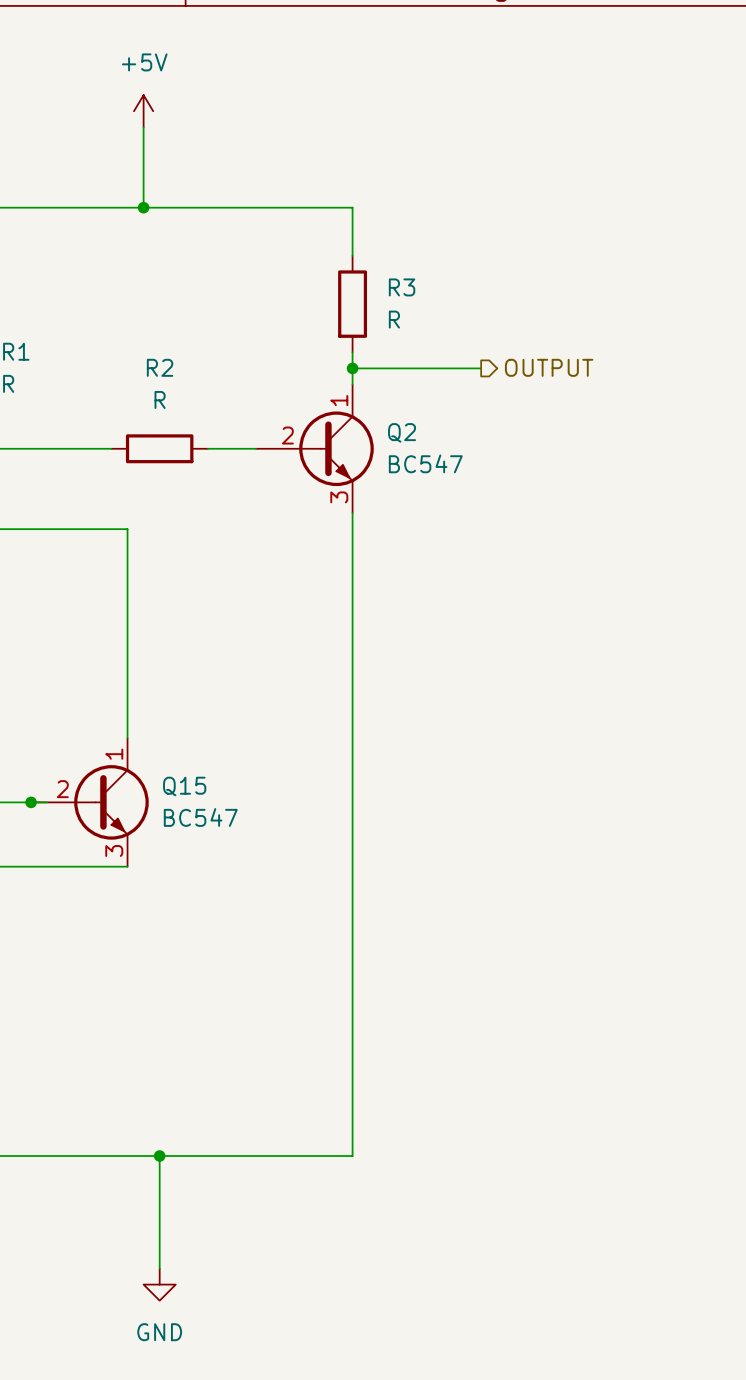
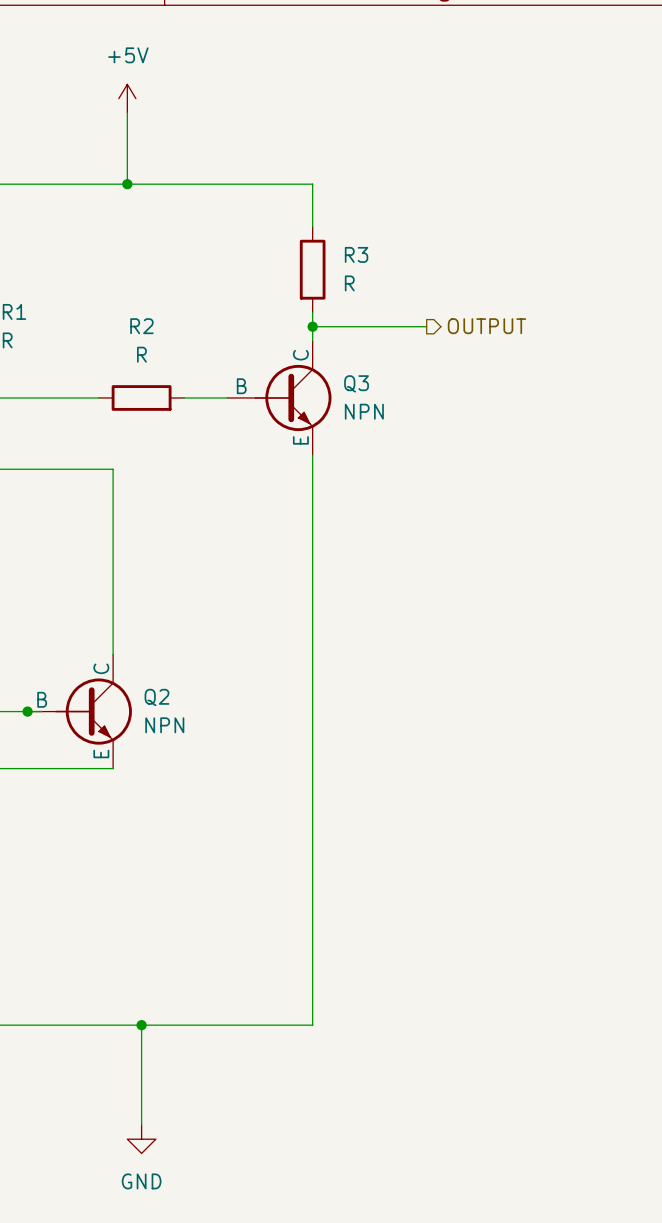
Q2 symbol: [256, 384, 374, 514] -> [27, 654, 132, 769]
Q3: none -> NPN (279, 397)
Q2 value: BC547 (425, 463) -> NPN (164, 725)
Q15: BC547 (89, 802) -> none

